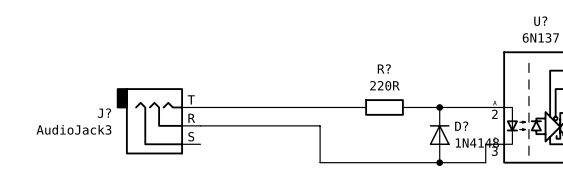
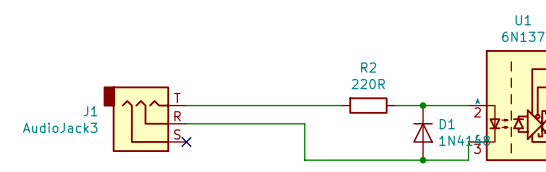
U? name: U? (540, 21) -> U1 (523, 20)
R? name: R? (384, 68) -> R2 (368, 67)
J? name: J? (104, 113) -> J1 (90, 111)
D? name: D? (461, 126) -> D1 (447, 124)
no-connect mark: none -> (186, 141)

